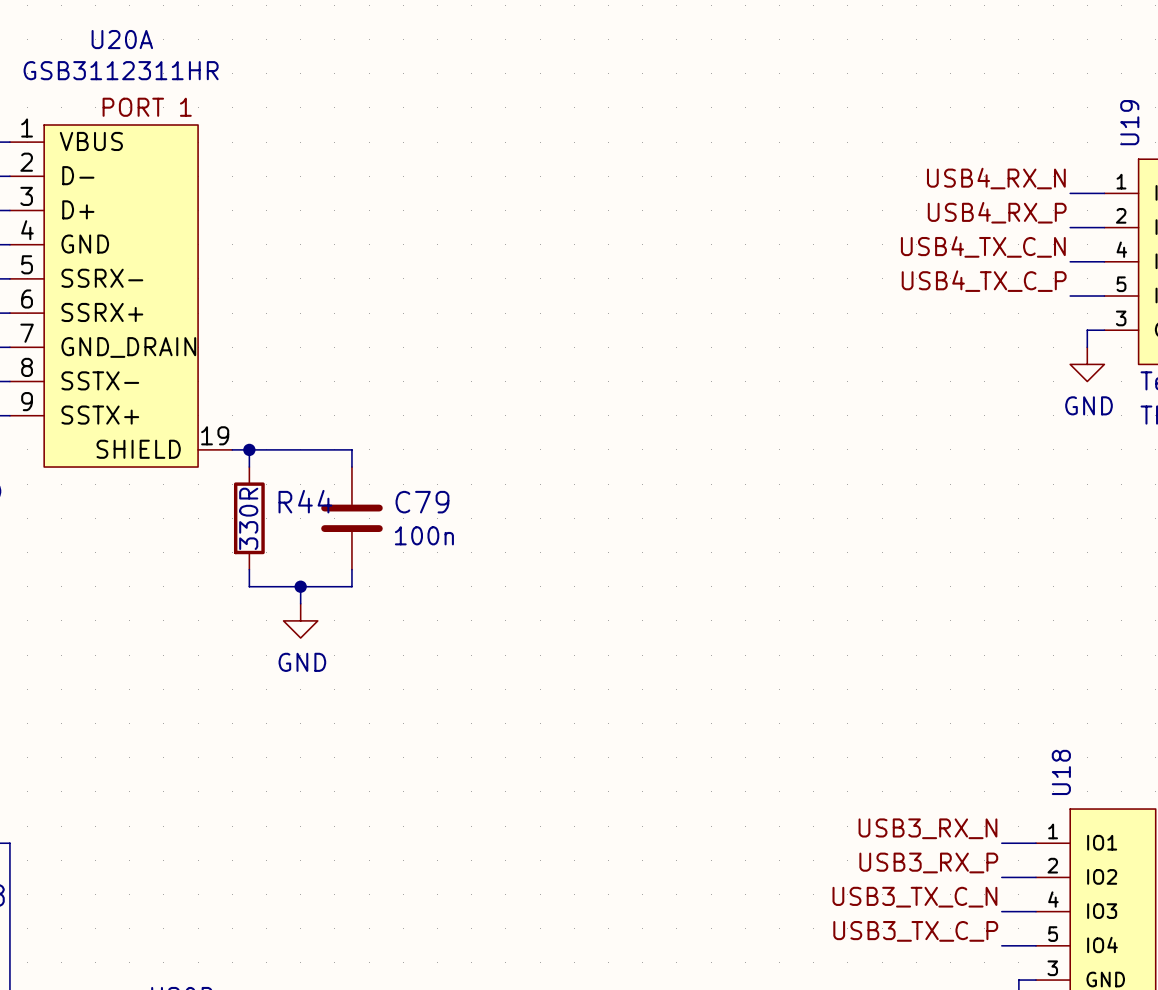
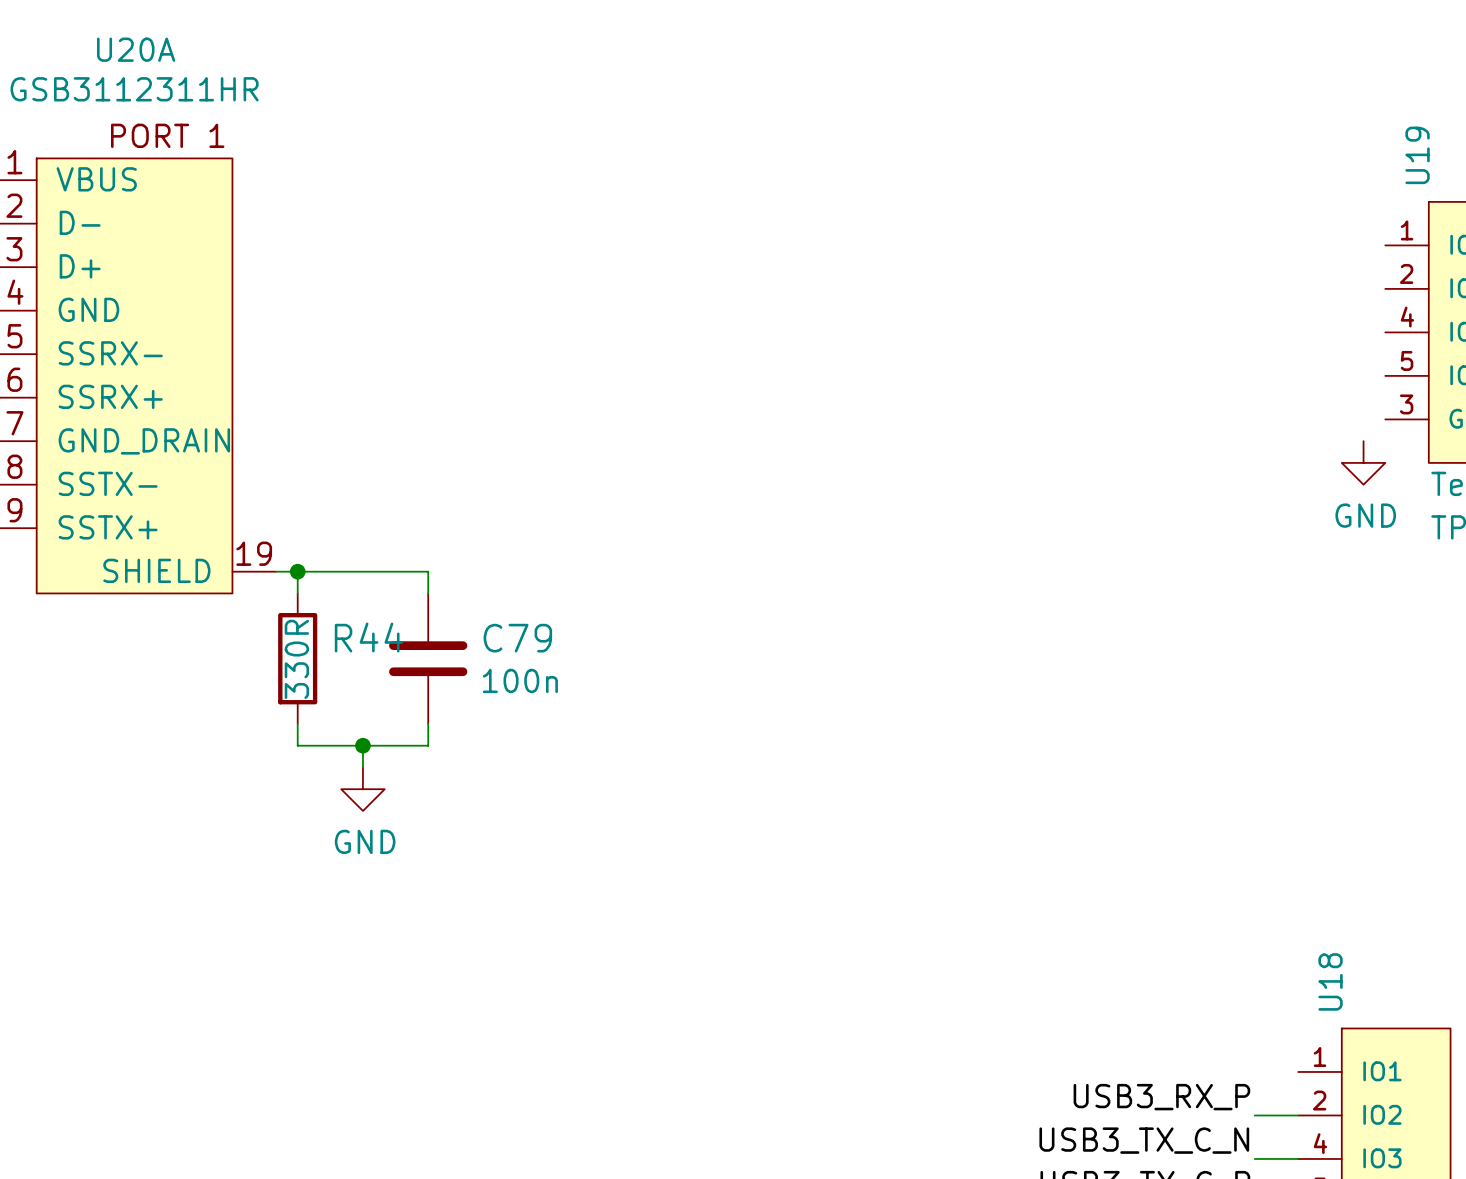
label: USB4_RX_N (996, 178) -> none
wire: (1070, 193) (1104, 193) -> none
label: USB4_RX_P (997, 212) -> none
wire: (1070, 227) (1104, 227) -> none
label: USB4_TX_C_N (983, 246) -> none
wire: (1070, 261) (1104, 261) -> none
label: USB4_TX_C_P (984, 281) -> none
wire: (1070, 296) (1104, 296) -> none
wire: (1104, 330) (1087, 330) (1087, 347) -> none
label: USB3_RX_N (927, 828) -> none
wire: (1001, 843) (1036, 843) -> none

